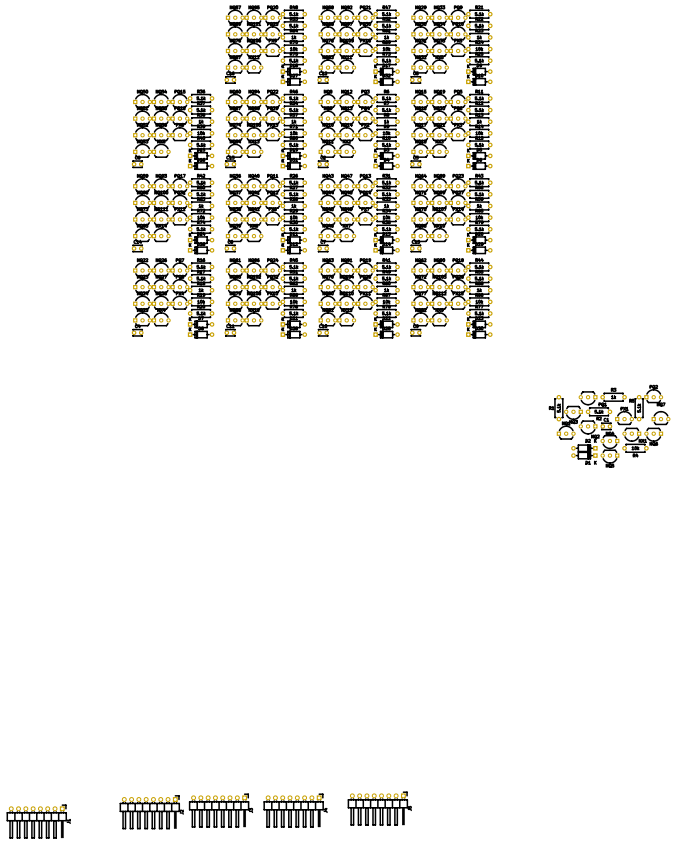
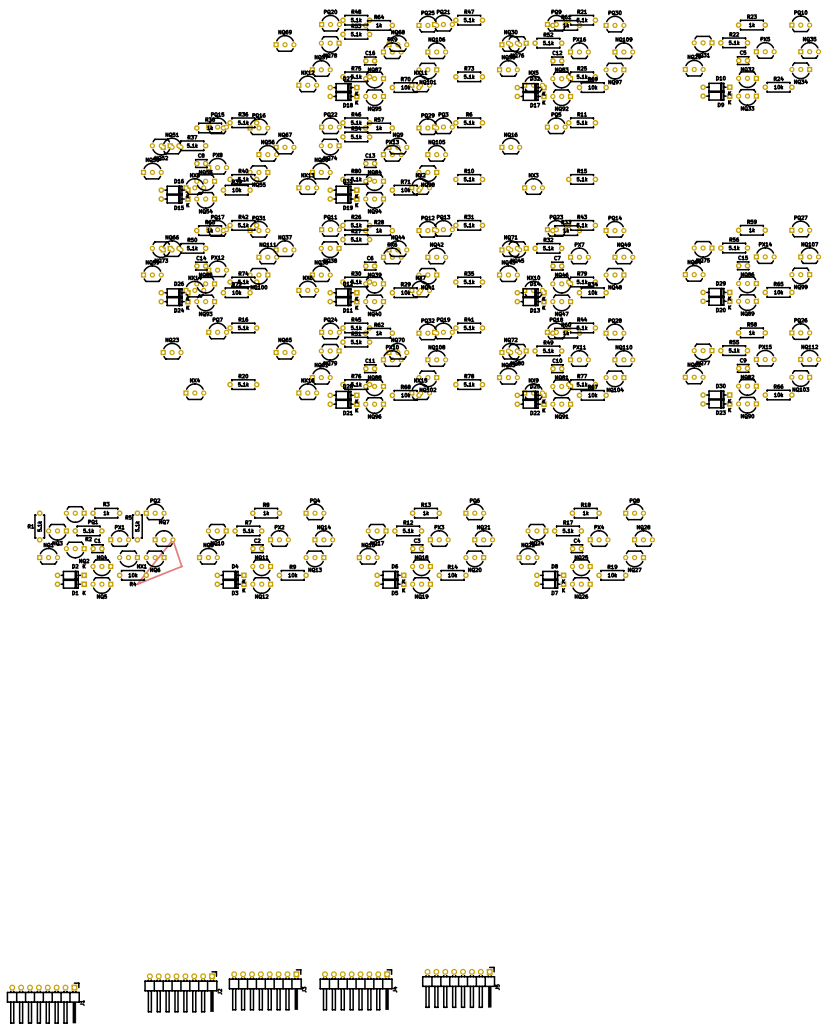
part position: (235, 16) -> (321, 68)
part rotation: 0° (253, 16) -> 180° (374, 97)
part position: (253, 16) -> (374, 97)
part position: (328, 16) -> (508, 68)
part rotation: 0° (346, 16) -> 180° (561, 97)
part position: (346, 16) -> (561, 97)
part position: (420, 16) -> (694, 68)
part rotation: 0° (439, 16) -> 180° (747, 97)
part position: (439, 16) -> (747, 97)
part position: (386, 25) -> (548, 43)
part position: (479, 25) -> (734, 42)
part rotation: 0° (253, 33) -> 180° (427, 71)
part position: (253, 33) -> (427, 71)
part position: (272, 33) -> (427, 24)
part rotation: 0° (346, 33) -> 180° (614, 71)
part position: (346, 33) -> (614, 71)
part position: (365, 33) -> (614, 24)
part rotation: 0° (439, 33) -> 180° (800, 70)
part position: (439, 33) -> (800, 70)
part position: (458, 33) -> (800, 23)
part position: (293, 37) -> (379, 25)
part position: (386, 37) -> (566, 25)
part position: (479, 37) -> (751, 25)
part rotation: 0° (235, 49) -> 180° (330, 44)
part position: (235, 49) -> (330, 44)
part position: (253, 49) -> (436, 50)
part position: (272, 49) -> (392, 50)
part position: (293, 49) -> (405, 87)
part rotation: 0° (328, 49) -> 180° (517, 44)
part position: (328, 49) -> (517, 44)
part position: (346, 49) -> (623, 50)
part position: (365, 49) -> (579, 50)
part position: (386, 49) -> (592, 87)
part rotation: 0° (420, 49) -> 180° (703, 44)
part position: (420, 49) -> (703, 44)
part position: (439, 49) -> (809, 50)
part position: (458, 49) -> (765, 50)
part position: (479, 49) -> (778, 87)
part rotation: 0° (235, 66) -> 180° (374, 80)
part position: (235, 66) -> (374, 80)
part rotation: 0° (328, 66) -> 180° (561, 80)
part position: (328, 66) -> (561, 80)
part rotation: 0° (420, 66) -> 180° (747, 79)
part position: (420, 66) -> (747, 79)
part rotation: 0° (293, 71) -> 180° (343, 96)
part rotation: 0° (386, 71) -> 180° (530, 96)
part position: (386, 71) -> (530, 96)
part rotation: 0° (479, 71) -> 180° (716, 96)
part position: (479, 71) -> (716, 96)
part position: (230, 79) -> (370, 60)
part position: (323, 79) -> (557, 60)
part position: (415, 79) -> (743, 60)
part rotation: 0° (293, 81) -> 180° (343, 87)
part position: (293, 81) -> (343, 87)
part rotation: 0° (386, 81) -> 180° (530, 87)
part position: (386, 81) -> (530, 87)
part rotation: 0° (479, 81) -> 180° (716, 87)
part position: (479, 81) -> (716, 87)
part position: (142, 100) -> (152, 171)
part rotation: 0° (161, 100) -> 180° (205, 200)
part position: (161, 100) -> (205, 200)
part position: (235, 100) -> (321, 171)
part rotation: 0° (253, 100) -> 180° (374, 200)
part position: (253, 100) -> (374, 200)
part position: (328, 100) -> (208, 556)
part rotation: 0° (346, 100) -> 180° (261, 585)
part position: (346, 100) -> (261, 585)
part position: (420, 100) -> (368, 556)
part rotation: 0° (439, 100) -> 180° (421, 585)
part position: (439, 100) -> (421, 585)
part position: (201, 110) -> (192, 145)
part position: (386, 110) -> (248, 530)
part position: (479, 110) -> (408, 530)
part rotation: 0° (161, 117) -> 180° (258, 173)
part position: (161, 117) -> (258, 173)
part position: (179, 117) -> (258, 126)
part rotation: 0° (253, 117) -> 180° (427, 173)
part position: (253, 117) -> (427, 173)
part position: (272, 117) -> (427, 126)
part rotation: 0° (346, 117) -> 180° (314, 558)
part position: (346, 117) -> (314, 558)
part position: (365, 117) -> (314, 511)
part rotation: 0° (439, 117) -> 180° (474, 558)
part position: (439, 117) -> (474, 558)
part position: (458, 117) -> (474, 511)
part position: (201, 121) -> (210, 128)
part position: (293, 121) -> (379, 128)
part position: (386, 121) -> (266, 513)
part position: (479, 121) -> (425, 513)
part position: (201, 133) -> (236, 190)
part position: (293, 133) -> (405, 190)
part position: (386, 133) -> (292, 575)
part position: (479, 133) -> (452, 575)
part rotation: 0° (142, 134) -> 180° (161, 147)
part position: (142, 134) -> (161, 147)
part position: (161, 134) -> (267, 153)
part rotation: 0° (235, 134) -> 180° (330, 147)
part position: (235, 134) -> (330, 147)
part position: (253, 134) -> (436, 153)
part position: (272, 134) -> (392, 153)
part rotation: 0° (328, 134) -> 180° (217, 532)
part position: (328, 134) -> (217, 532)
part position: (346, 134) -> (323, 538)
part position: (365, 134) -> (279, 538)
part rotation: 0° (420, 134) -> 180° (377, 532)
part position: (420, 134) -> (377, 532)
part position: (439, 134) -> (483, 538)
part position: (458, 134) -> (439, 538)
part rotation: 0° (142, 150) -> 180° (205, 182)
part position: (142, 150) -> (205, 182)
part rotation: 0° (235, 150) -> 180° (374, 182)
part position: (235, 150) -> (374, 182)
part rotation: 0° (328, 150) -> 180° (261, 567)
part position: (328, 150) -> (261, 567)
part rotation: 0° (420, 150) -> 180° (421, 567)
part position: (420, 150) -> (421, 567)
part rotation: 0° (201, 155) -> 180° (174, 199)
part position: (201, 155) -> (174, 199)
part rotation: 0° (293, 155) -> 180° (343, 199)
part rotation: 0° (386, 155) -> 180° (230, 584)
part position: (386, 155) -> (230, 584)
part rotation: 0° (479, 155) -> 180° (390, 584)
part position: (479, 155) -> (390, 584)
part position: (137, 164) -> (201, 163)
part position: (230, 164) -> (370, 163)
part position: (323, 164) -> (257, 548)
part position: (415, 164) -> (417, 548)
part rotation: 0° (201, 166) -> 180° (174, 190)
part position: (201, 166) -> (174, 190)
part rotation: 0° (293, 166) -> 180° (343, 190)
part position: (293, 166) -> (343, 190)
part rotation: 0° (386, 166) -> 180° (230, 575)
part position: (386, 166) -> (230, 575)
part rotation: 0° (479, 166) -> 180° (390, 575)
part position: (479, 166) -> (390, 575)
part position: (142, 185) -> (152, 273)
part rotation: 0° (161, 185) -> 180° (205, 302)
part position: (161, 185) -> (205, 302)
part position: (235, 185) -> (321, 273)
part rotation: 0° (253, 185) -> 180° (374, 302)
part position: (253, 185) -> (374, 302)
part position: (328, 185) -> (508, 273)
part rotation: 0° (346, 185) -> 180° (561, 302)
part position: (346, 185) -> (561, 302)
part position: (420, 185) -> (694, 273)
part rotation: 0° (439, 185) -> 180° (747, 302)
part position: (439, 185) -> (747, 302)
part position: (201, 194) -> (192, 248)
part position: (386, 194) -> (548, 248)
part position: (479, 194) -> (734, 248)
part rotation: 0° (161, 201) -> 180° (258, 276)
part position: (161, 201) -> (258, 276)
part position: (179, 201) -> (258, 229)
part rotation: 0° (253, 201) -> 180° (427, 276)
part position: (253, 201) -> (427, 276)
part position: (272, 201) -> (427, 229)
part rotation: 0° (346, 201) -> 180° (614, 276)
part position: (346, 201) -> (614, 276)
part position: (365, 201) -> (614, 229)
part rotation: 0° (439, 201) -> 180° (800, 275)
part position: (439, 201) -> (800, 275)
part position: (458, 201) -> (800, 228)
part position: (201, 205) -> (210, 230)
part position: (293, 205) -> (379, 230)
part position: (386, 205) -> (566, 230)
part position: (479, 205) -> (751, 230)
part position: (201, 217) -> (236, 292)
part position: (293, 217) -> (405, 292)
part position: (386, 217) -> (592, 292)
part position: (479, 217) -> (778, 292)
part rotation: 0° (142, 218) -> 180° (161, 249)
part position: (142, 218) -> (161, 249)
part position: (161, 218) -> (267, 255)
part rotation: 0° (235, 218) -> 180° (330, 249)
part position: (235, 218) -> (330, 249)
part position: (253, 218) -> (436, 255)
part position: (272, 218) -> (392, 255)
part rotation: 0° (328, 218) -> 180° (517, 249)
part position: (328, 218) -> (517, 249)
part position: (346, 218) -> (623, 255)
part position: (365, 218) -> (579, 255)
part rotation: 0° (420, 218) -> 180° (703, 249)
part position: (420, 218) -> (703, 249)
part position: (439, 218) -> (809, 255)
part position: (458, 218) -> (765, 255)
part rotation: 0° (142, 235) -> 180° (205, 285)
part position: (142, 235) -> (205, 285)
part rotation: 0° (235, 235) -> 180° (374, 285)
part position: (235, 235) -> (374, 285)
part rotation: 0° (328, 235) -> 180° (561, 285)
part position: (328, 235) -> (561, 285)
part rotation: 0° (420, 235) -> 180° (747, 284)
part position: (420, 235) -> (747, 284)
part rotation: 0° (201, 240) -> 180° (174, 301)
part position: (201, 240) -> (174, 301)
part rotation: 0° (293, 240) -> 180° (343, 301)
part rotation: 0° (386, 240) -> 180° (530, 301)
part position: (386, 240) -> (530, 301)
part rotation: 0° (479, 240) -> 180° (716, 301)
part position: (479, 240) -> (716, 301)
part position: (137, 248) -> (201, 266)
part position: (230, 248) -> (370, 266)
part position: (323, 248) -> (557, 266)
part position: (415, 248) -> (743, 265)
part rotation: 0° (201, 250) -> 180° (174, 292)
part position: (201, 250) -> (174, 292)
part rotation: 0° (293, 250) -> 180° (343, 292)
part position: (293, 250) -> (343, 292)
part rotation: 0° (386, 250) -> 180° (530, 292)
part position: (386, 250) -> (530, 292)
part rotation: 0° (479, 250) -> 180° (716, 292)
part position: (479, 250) -> (716, 292)
part position: (142, 269) -> (528, 556)
part rotation: 0° (161, 269) -> 180° (581, 585)
part position: (161, 269) -> (581, 585)
part position: (235, 269) -> (321, 376)
part rotation: 0° (253, 269) -> 180° (374, 405)
part position: (253, 269) -> (374, 405)
part position: (328, 269) -> (508, 376)
part rotation: 0° (346, 269) -> 180° (561, 405)
part position: (346, 269) -> (561, 405)
part position: (420, 269) -> (694, 375)
part rotation: 0° (439, 269) -> 180° (747, 405)
part position: (439, 269) -> (747, 405)
part position: (201, 278) -> (568, 530)
part position: (386, 278) -> (548, 350)
part position: (479, 278) -> (734, 350)
part rotation: 0° (161, 286) -> 180° (634, 558)
part position: (161, 286) -> (634, 558)
part position: (179, 286) -> (634, 511)
part rotation: 0° (253, 286) -> 180° (427, 378)
part position: (253, 286) -> (427, 378)
part position: (272, 286) -> (427, 331)
part rotation: 0° (346, 286) -> 180° (614, 378)
part position: (346, 286) -> (614, 378)
part position: (365, 286) -> (614, 331)
part rotation: 0° (439, 286) -> 180° (800, 378)
part position: (439, 286) -> (800, 378)
part position: (458, 286) -> (800, 331)
part position: (201, 290) -> (585, 513)
part position: (293, 290) -> (379, 333)
part position: (386, 290) -> (566, 333)
part position: (479, 290) -> (751, 332)
part position: (201, 301) -> (612, 575)
part position: (293, 301) -> (405, 395)
part position: (386, 301) -> (592, 395)
part position: (479, 301) -> (778, 395)
part rotation: 0° (142, 302) -> 180° (536, 532)
part position: (142, 302) -> (536, 532)
part position: (161, 302) -> (643, 538)
part position: (179, 302) -> (599, 538)
part rotation: 0° (235, 302) -> 180° (330, 352)
part position: (235, 302) -> (330, 352)
part position: (253, 302) -> (436, 358)
part position: (272, 302) -> (392, 358)
part rotation: 0° (328, 302) -> 180° (517, 352)
part position: (328, 302) -> (517, 352)
part position: (346, 302) -> (623, 358)
part position: (365, 302) -> (579, 358)
part rotation: 0° (420, 302) -> 180° (703, 351)
part position: (420, 302) -> (703, 351)
part position: (439, 302) -> (809, 358)
part position: (458, 302) -> (765, 358)
part rotation: 0° (142, 319) -> 180° (581, 567)
part position: (142, 319) -> (581, 567)
part rotation: 0° (235, 319) -> 180° (374, 387)
part position: (235, 319) -> (374, 387)
part rotation: 0° (328, 319) -> 180° (561, 387)
part position: (328, 319) -> (561, 387)
part rotation: 0° (420, 319) -> 180° (747, 387)
part position: (420, 319) -> (747, 387)
part rotation: 0° (201, 324) -> 180° (550, 584)
part position: (201, 324) -> (550, 584)
part rotation: 0° (293, 324) -> 180° (343, 404)
part rotation: 0° (386, 324) -> 180° (530, 404)
part position: (386, 324) -> (530, 404)
part rotation: 0° (479, 324) -> 180° (716, 403)
part position: (479, 324) -> (716, 403)
part position: (137, 332) -> (576, 548)
part position: (230, 332) -> (370, 368)
part position: (323, 332) -> (557, 368)
part position: (415, 332) -> (743, 368)
part rotation: 0° (201, 334) -> 180° (550, 575)
part position: (201, 334) -> (550, 575)
part rotation: 0° (293, 334) -> 180° (343, 395)
part position: (293, 334) -> (343, 395)
part rotation: 0° (386, 334) -> 180° (530, 395)
part position: (386, 334) -> (530, 395)
part rotation: 0° (479, 334) -> 180° (716, 395)
part position: (479, 334) -> (716, 395)
part position: (653, 396) -> (155, 511)
part position: (613, 397) -> (106, 513)
part position: (588, 398) -> (75, 514)
part position: (558, 408) -> (39, 526)
part position: (639, 408) -> (137, 526)
part position: (599, 411) -> (88, 530)
part position: (573, 412) -> (57, 532)
part position: (624, 418) -> (119, 538)
part position: (661, 418) -> (164, 538)
part position: (606, 426) -> (97, 548)
part position: (588, 427) -> (75, 550)
part position: (566, 432) -> (48, 556)
part position: (631, 434) -> (128, 558)
part position: (653, 434) -> (155, 558)
track: none -> (172, 539) (181, 566) (137, 584) (172, 539)
part position: (609, 442) -> (101, 567)
part position: (584, 448) -> (70, 575)
part position: (635, 448) -> (132, 575)
part position: (584, 455) -> (70, 584)
part position: (609, 456) -> (101, 585)

